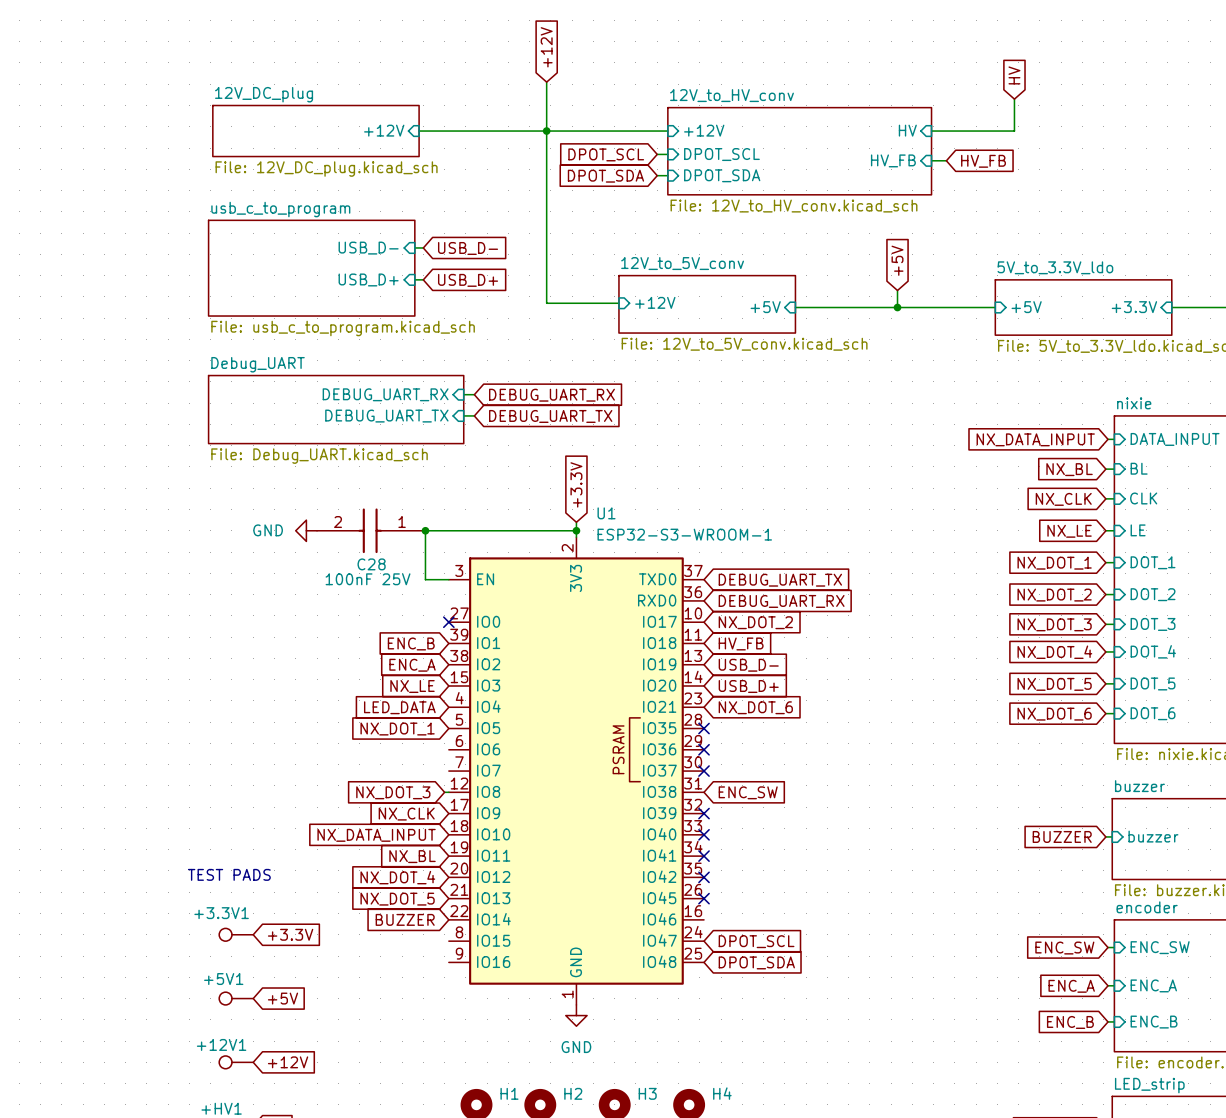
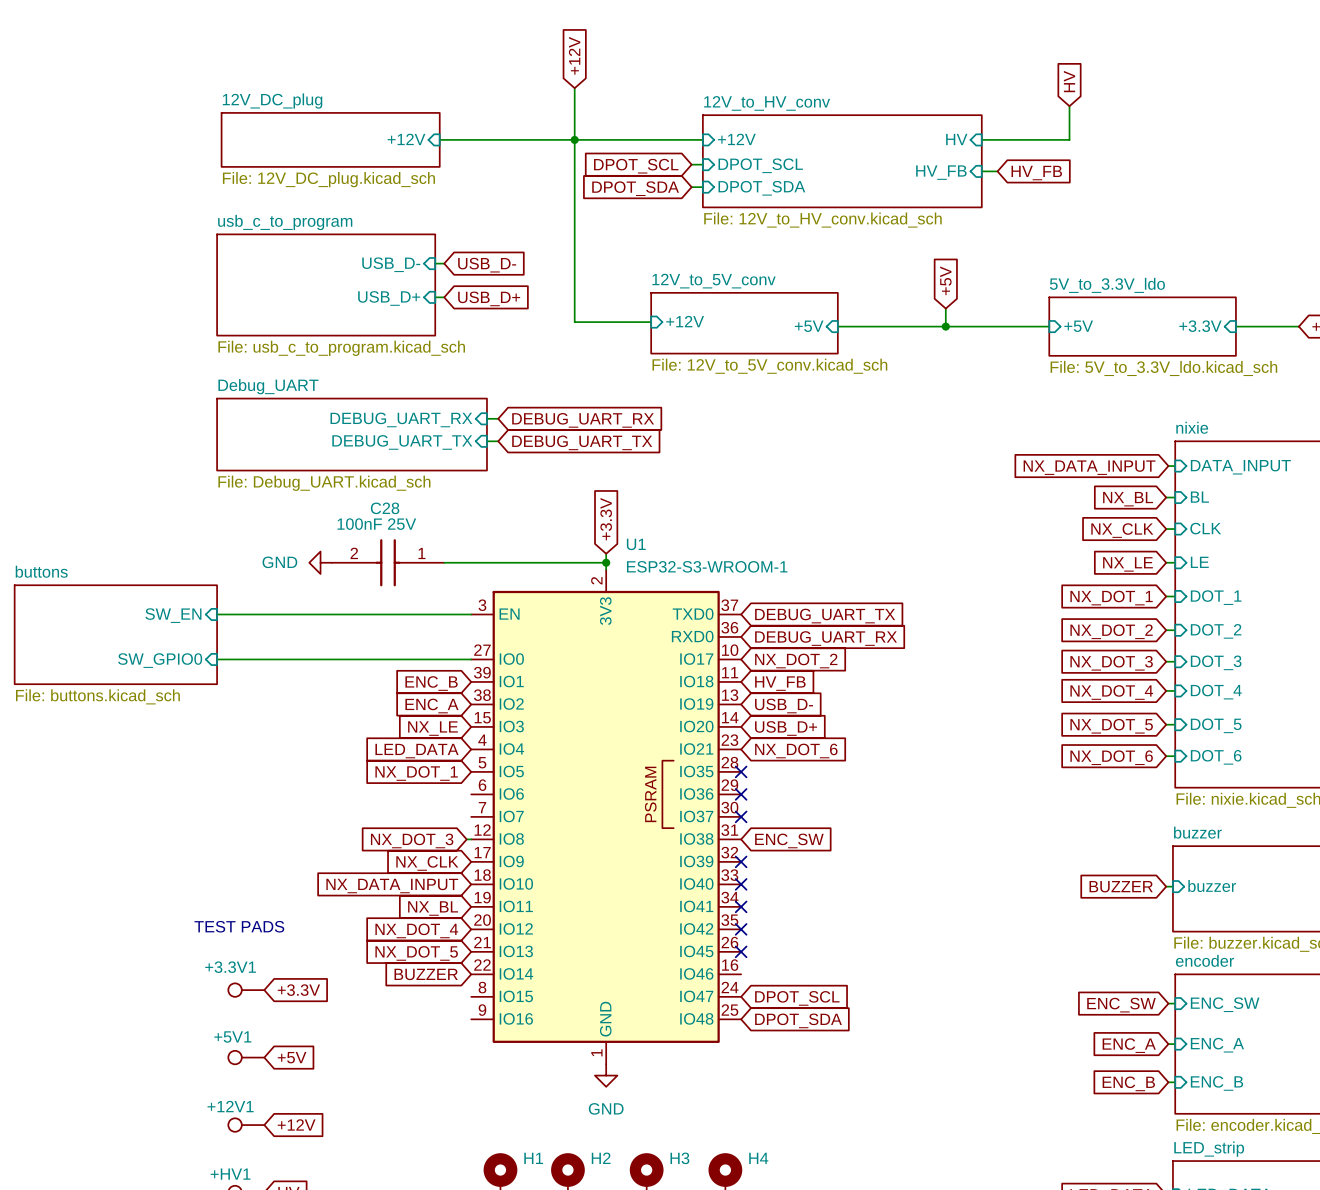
wire: (425, 530) (425, 579) -> (217, 614) (446, 614)
junction: (425, 530) -> none
C28 name position: C28 (371, 564) -> C28 (385, 508)
sheet pin: none -> SW_EN (173, 615)
C28 value position: 100nF 25V (368, 579) -> 100nF 25V (376, 524)
sheet buttons: none -> File: buttons.kicad_sch (115, 634)
sheet pin: none -> SW_GPIO0 (160, 660)
wire: none -> (217, 659) (471, 659)
no-connect mark: (448, 622) -> none

